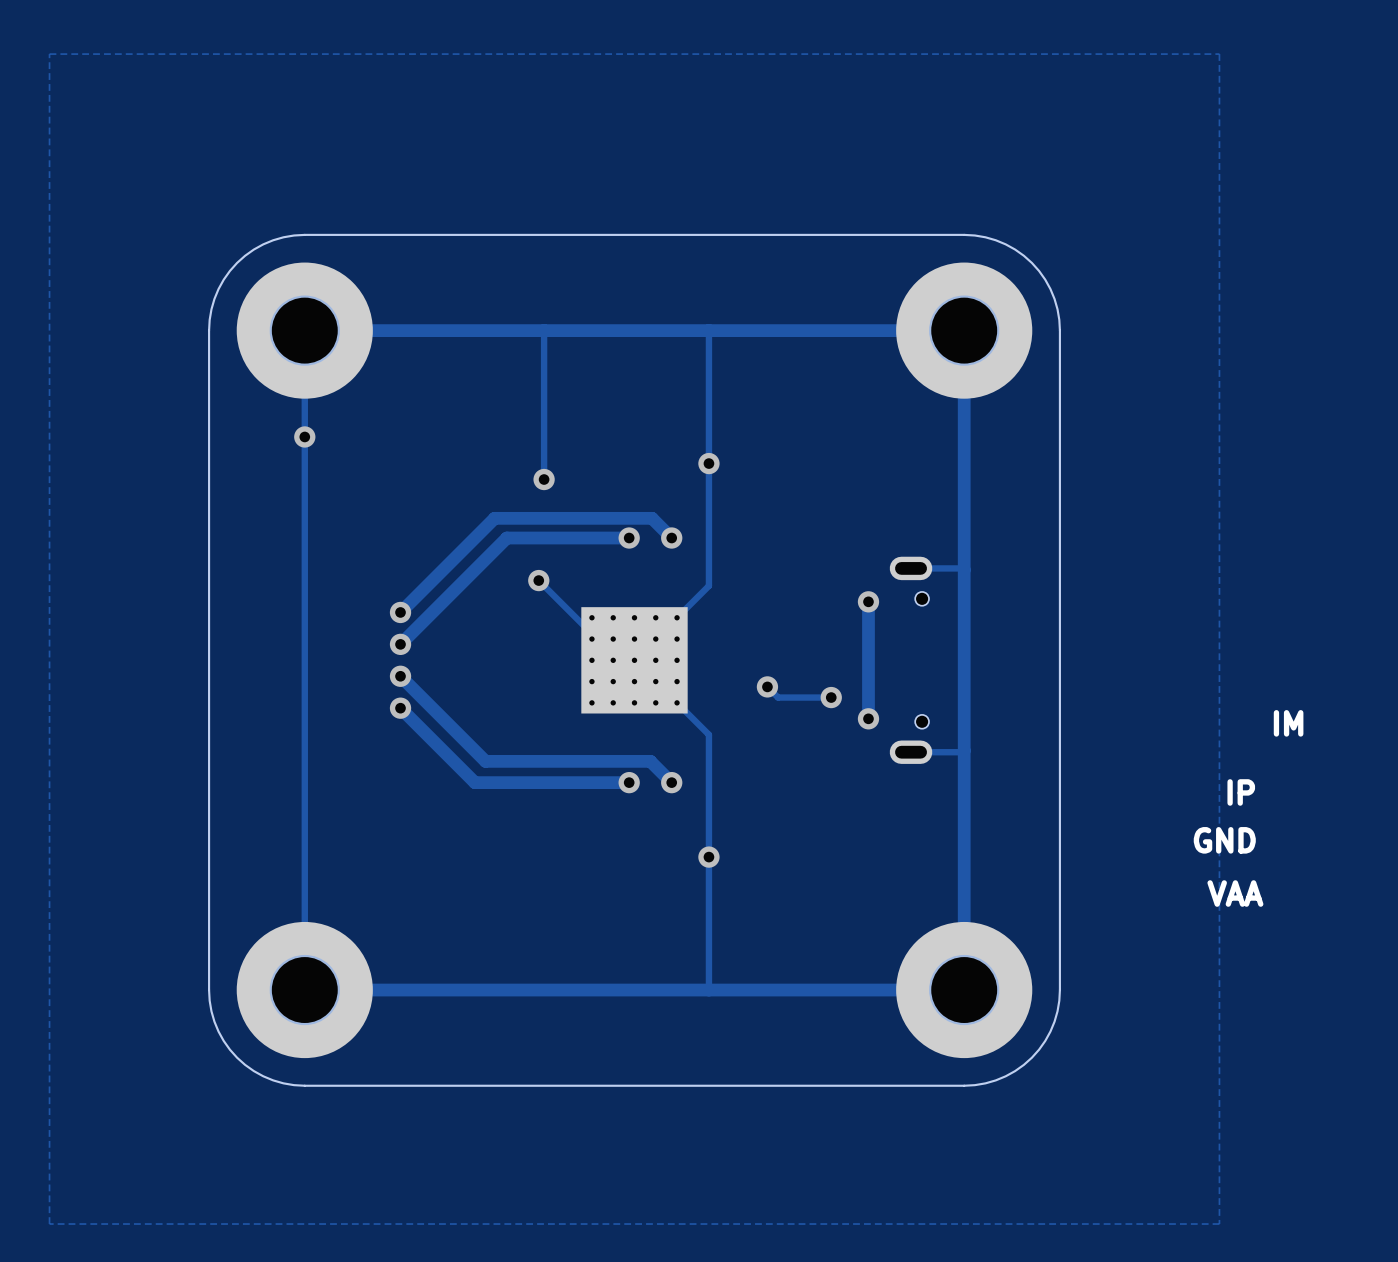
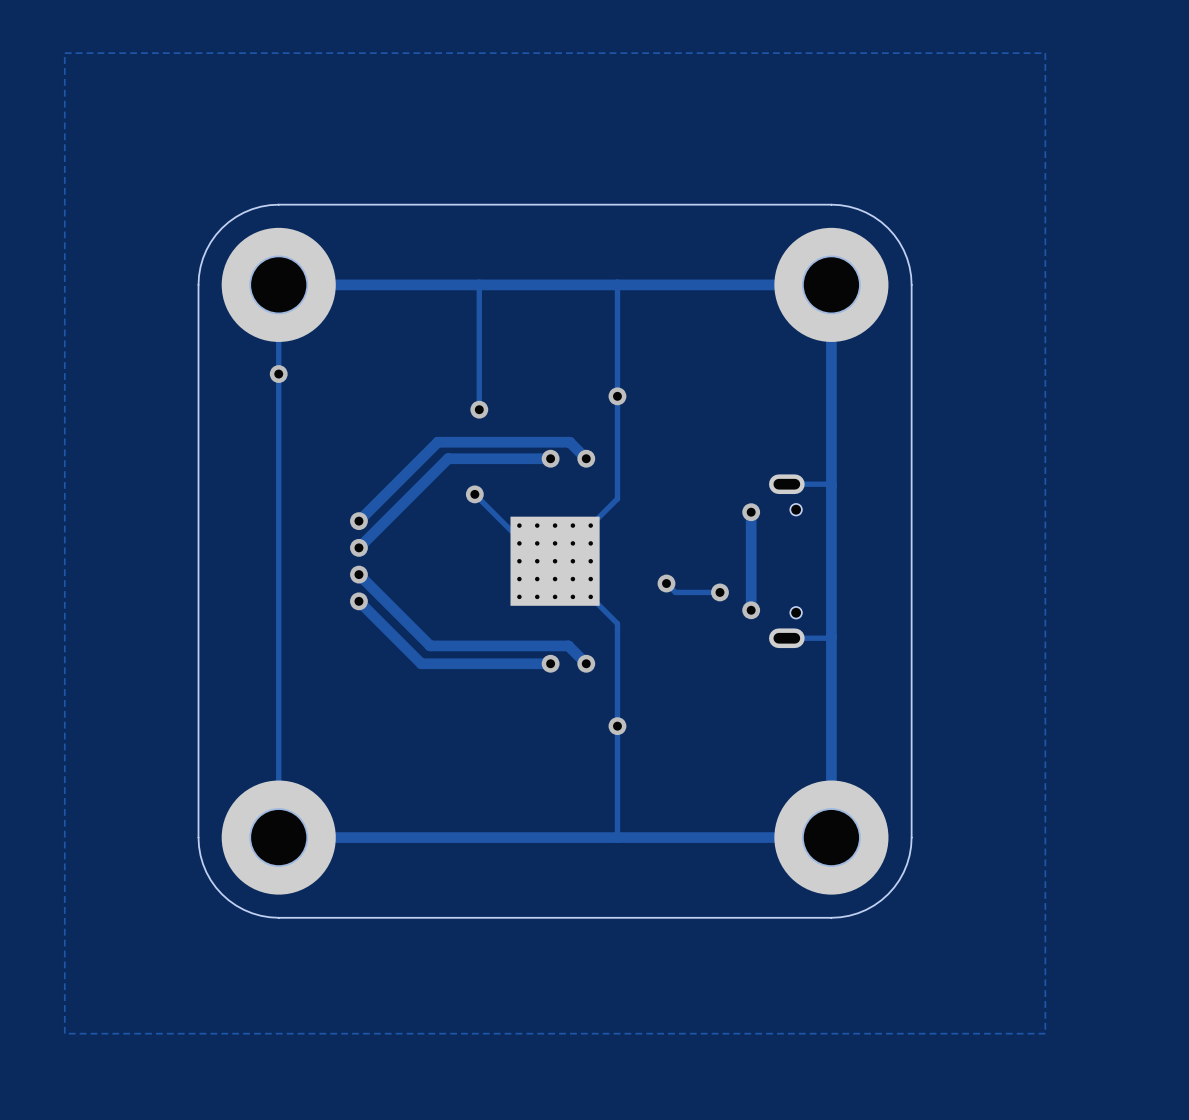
text: IM (1288, 723) -> none
text: IP (1241, 792) -> none
text: GND (1224, 840) -> none
text: VAA (1235, 893) -> none

